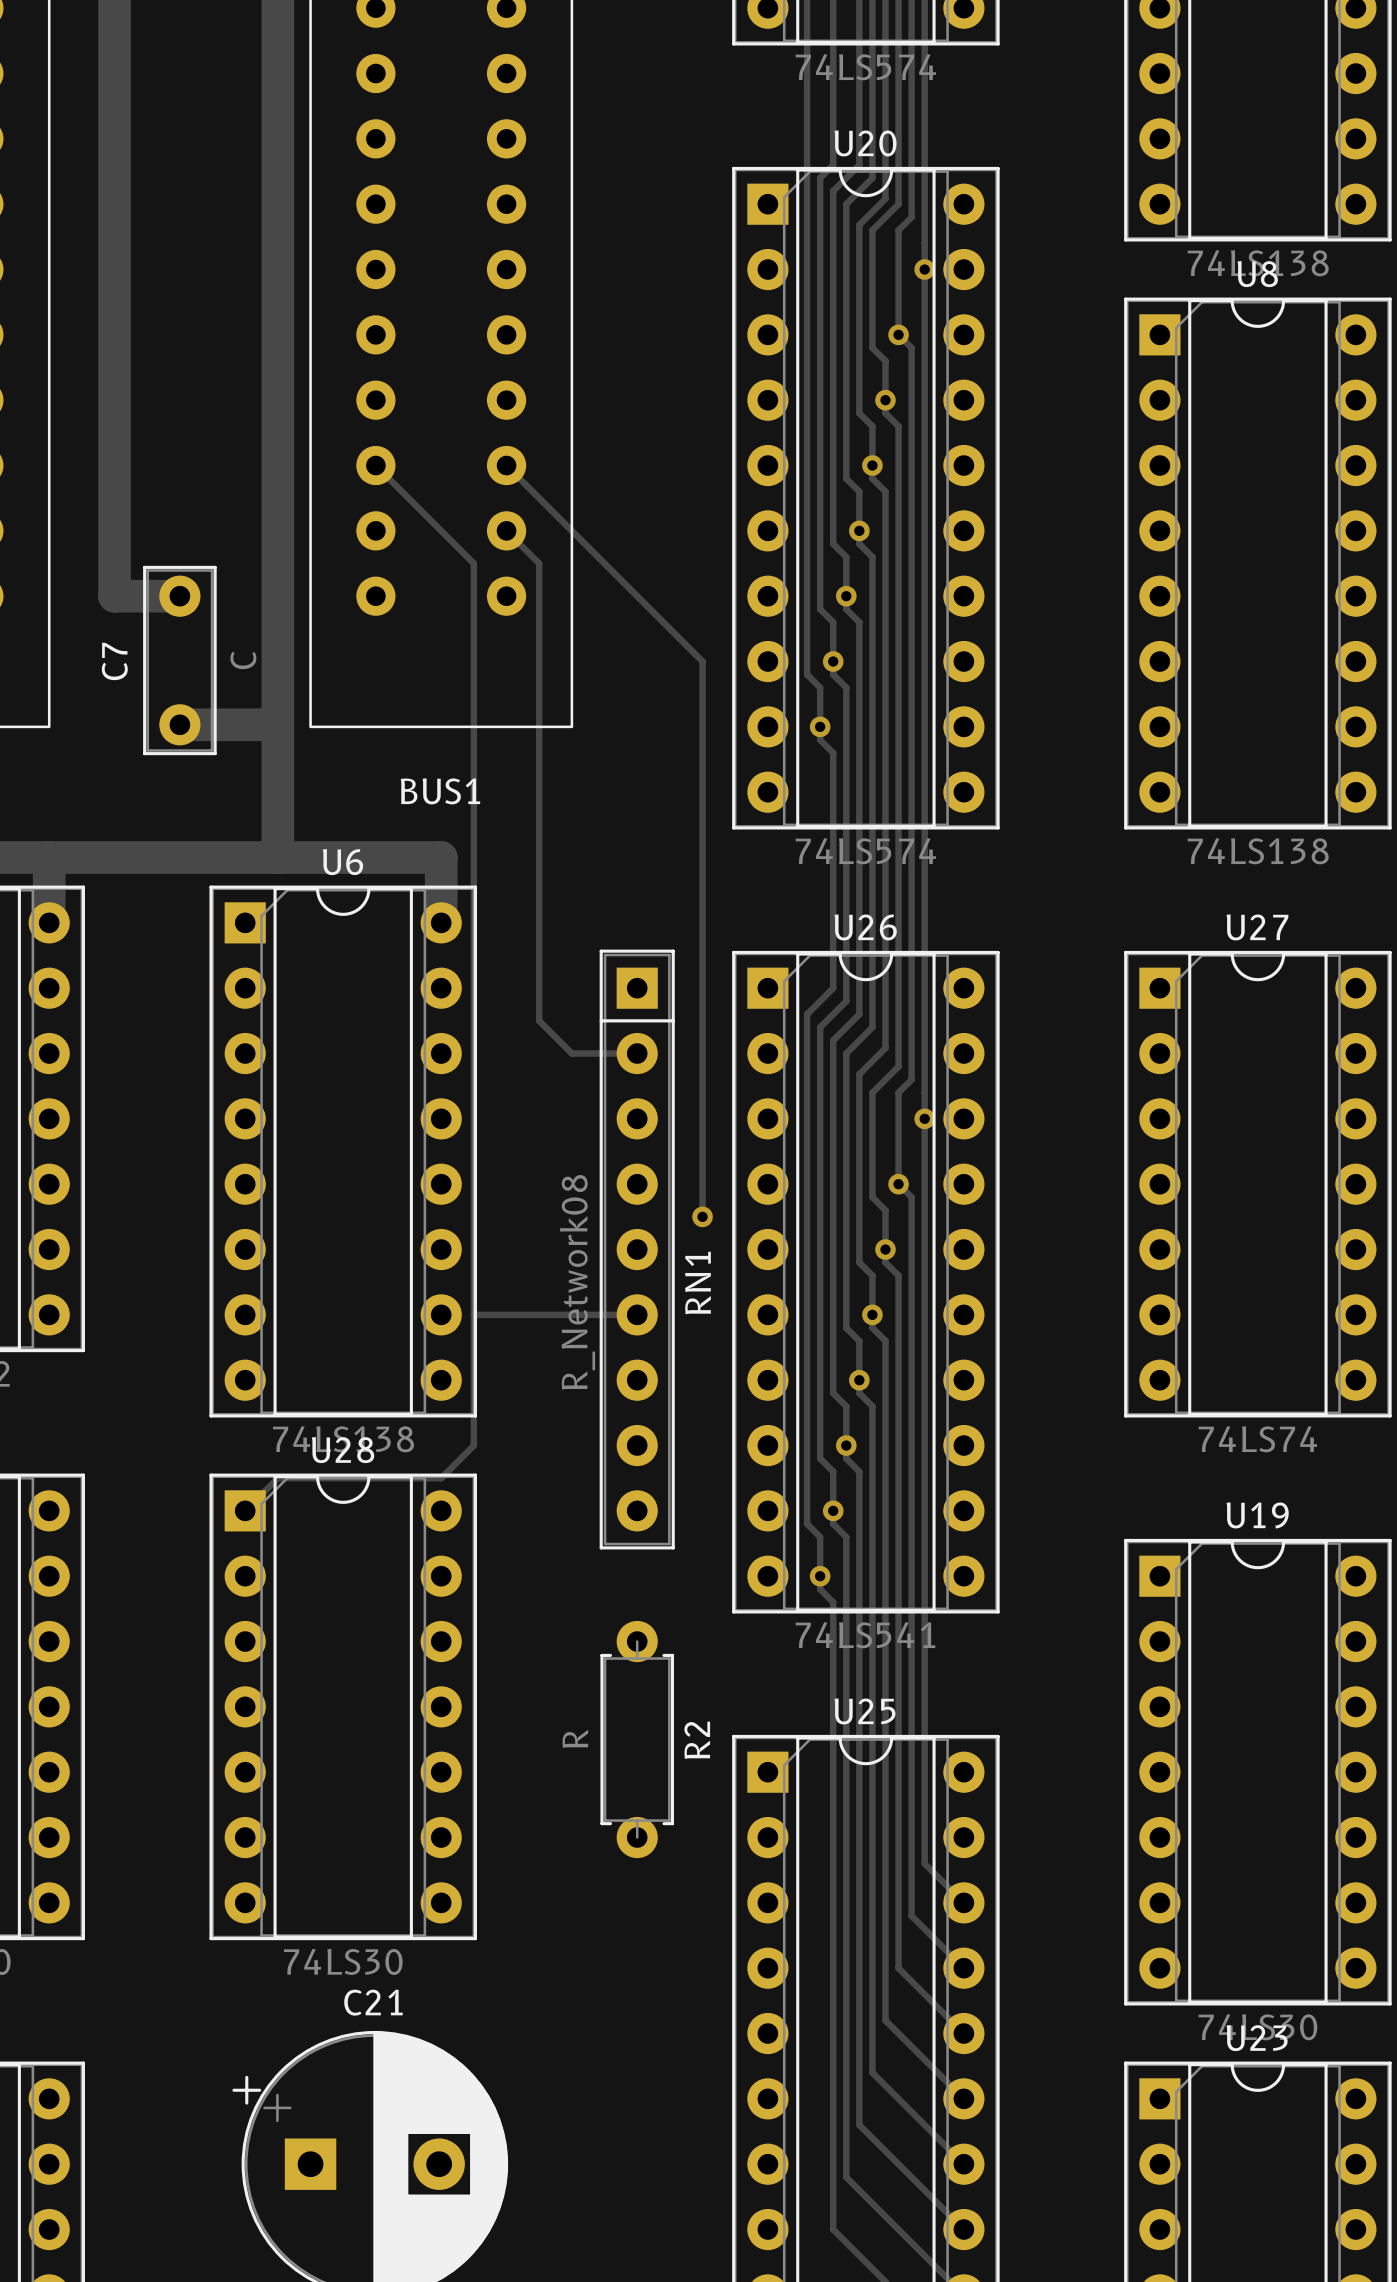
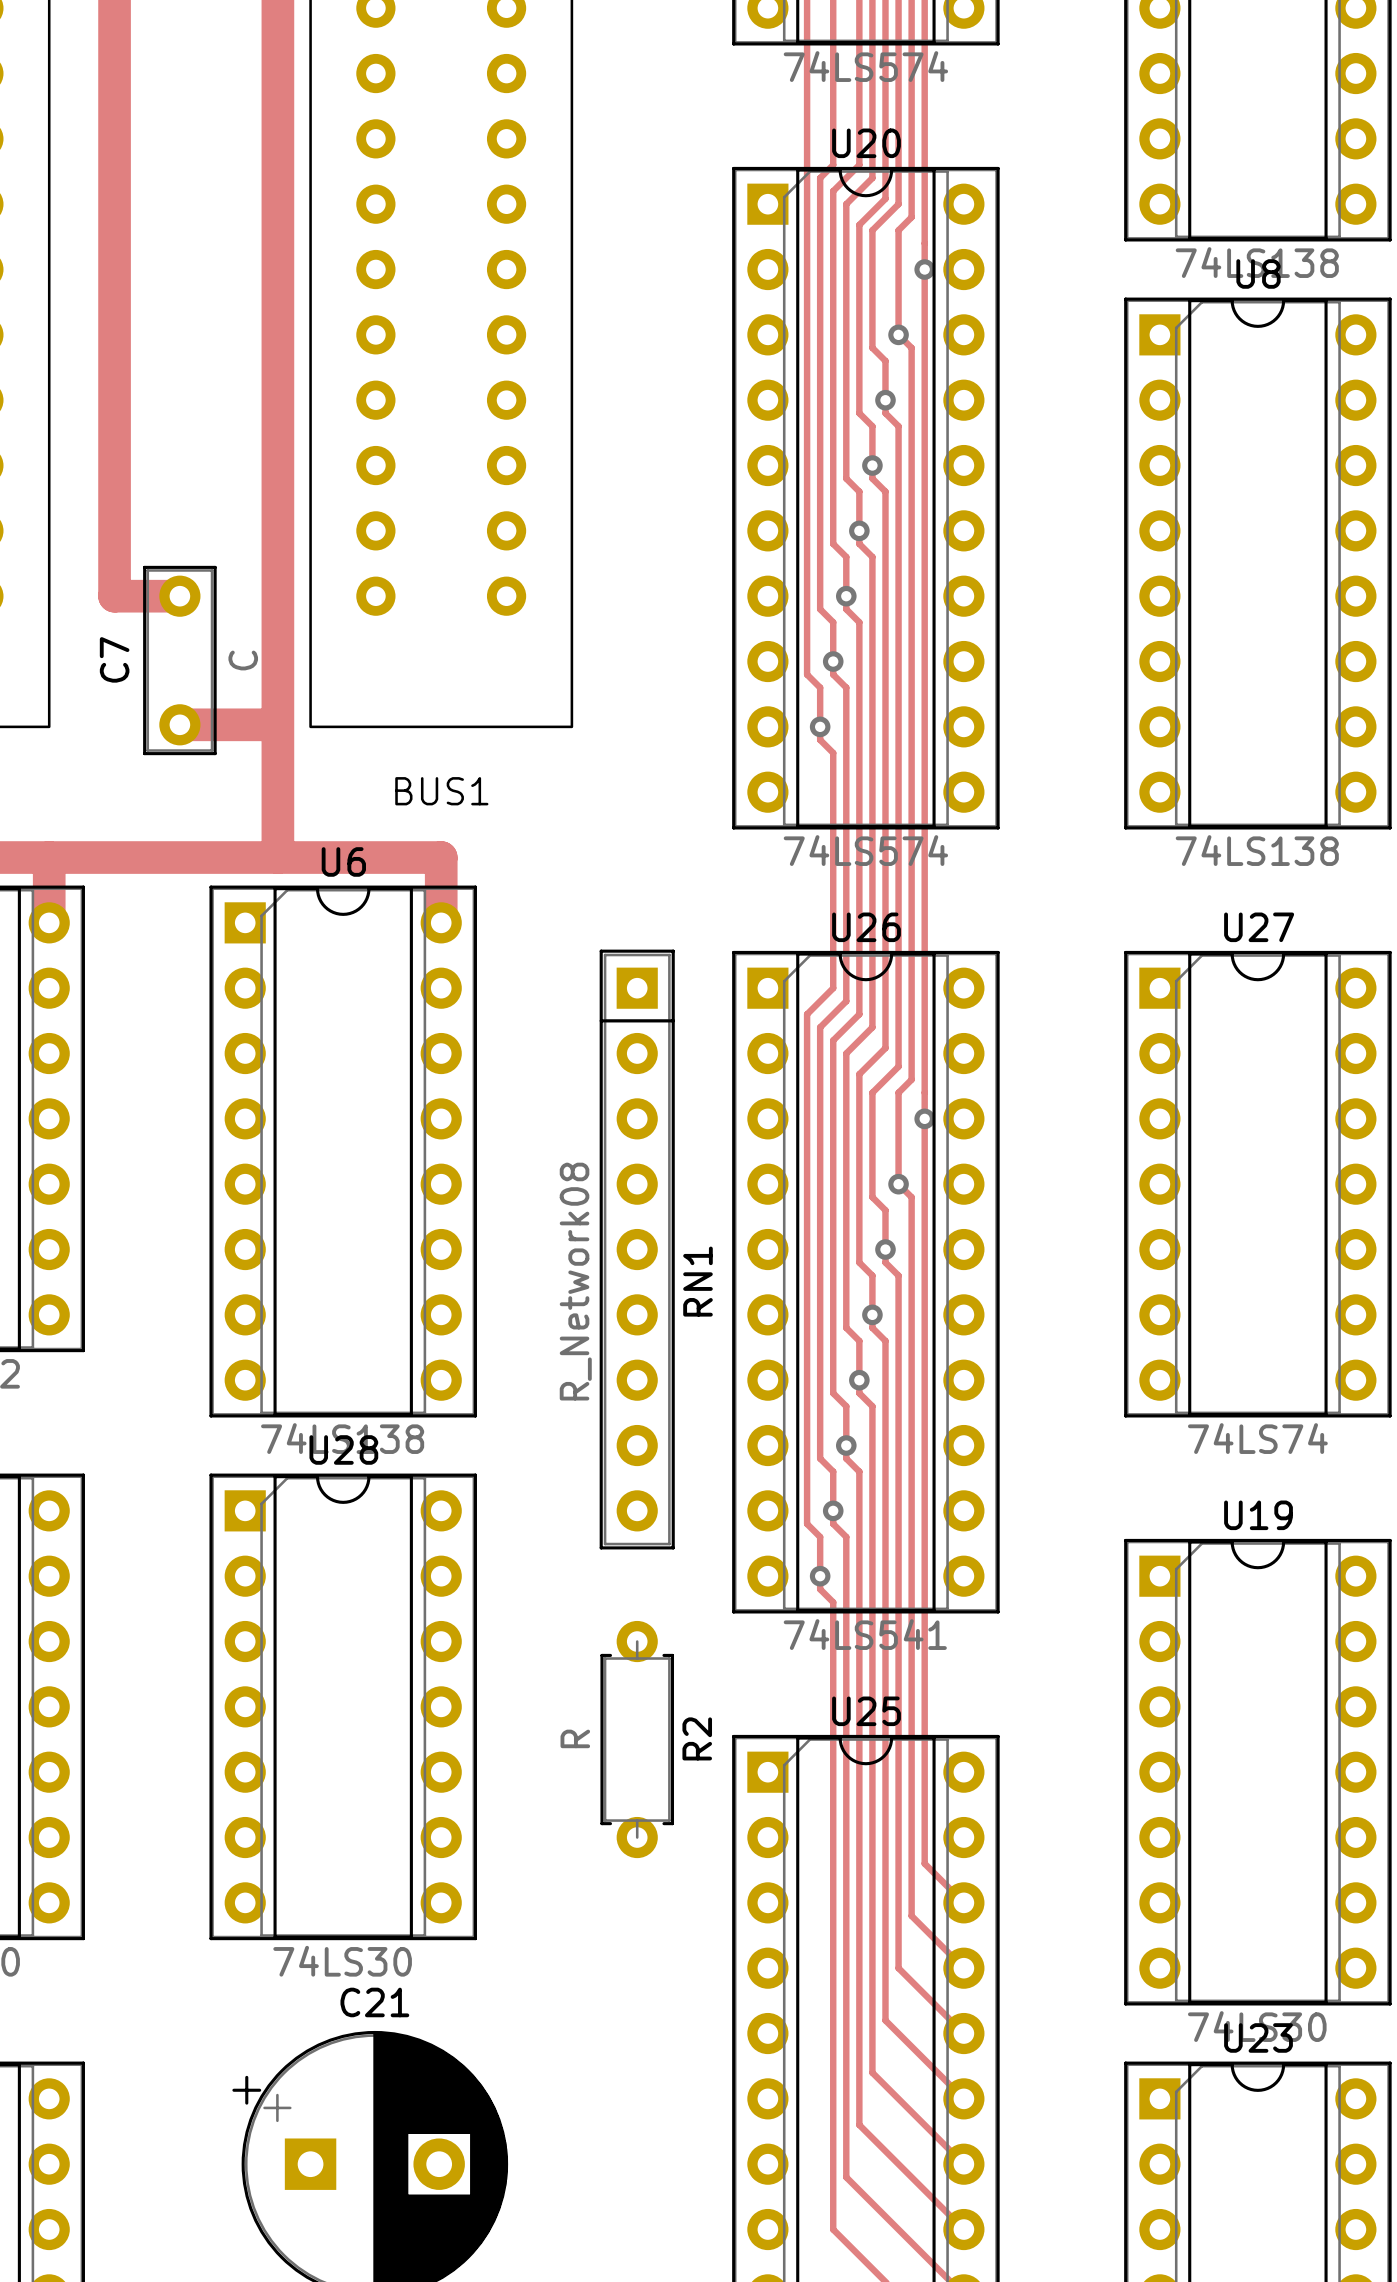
track: (375, 465) (473, 563) (473, 1445) (441, 1478) (277, 1478) (245, 1510) -> none
track: (506, 465) (702, 661) (702, 1216) -> none
track: (506, 530) (539, 563) (539, 1020) (571, 1053) (637, 1053) -> none
via: (702, 1216) -> none
track: (473, 1314) (637, 1314) -> none

